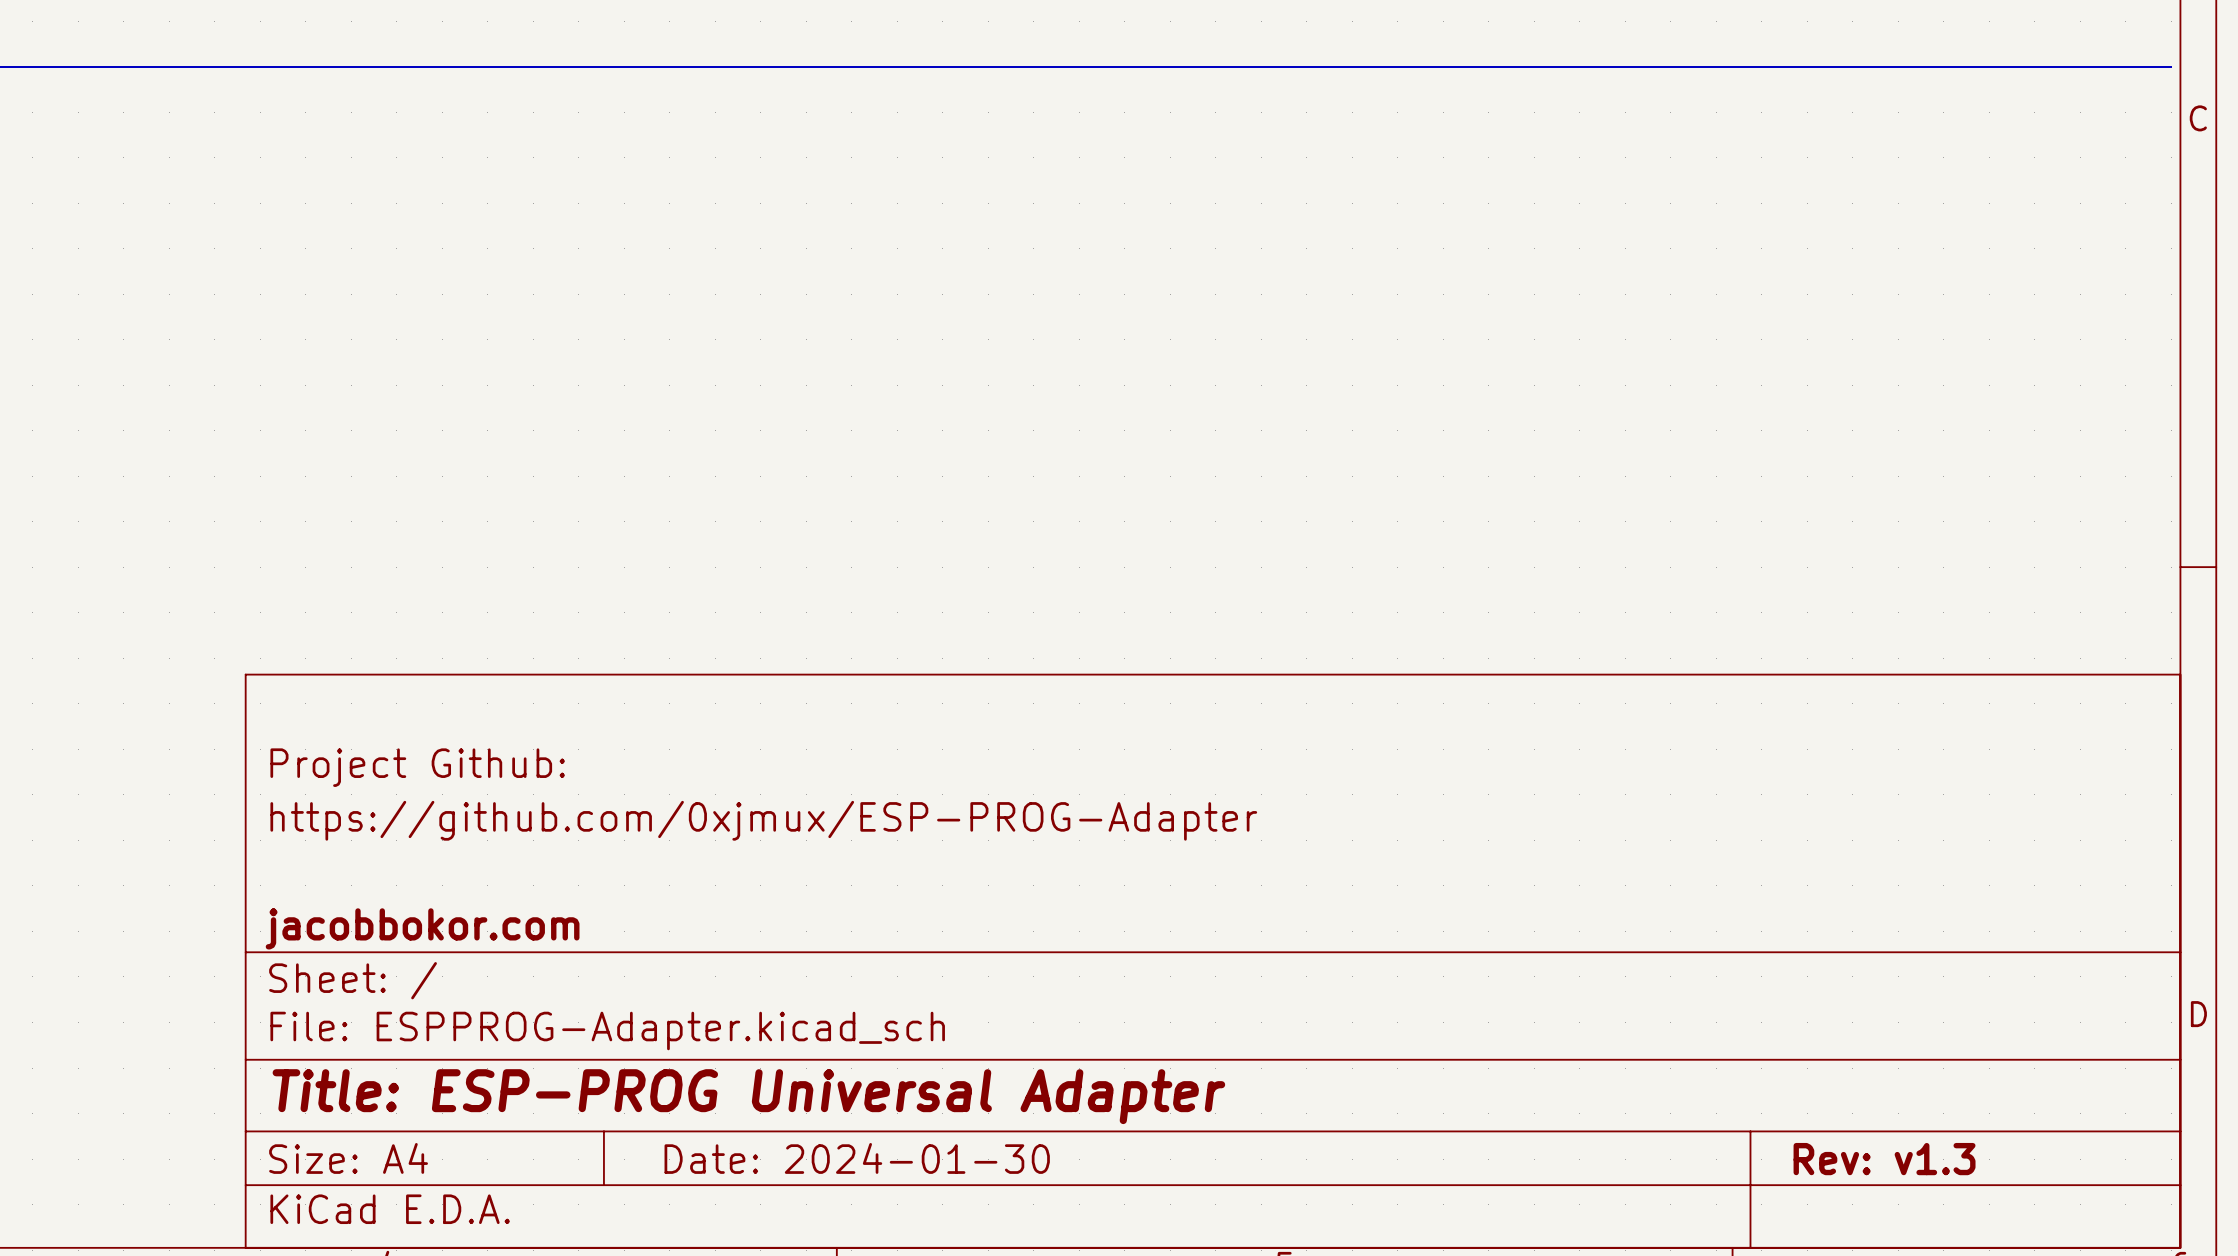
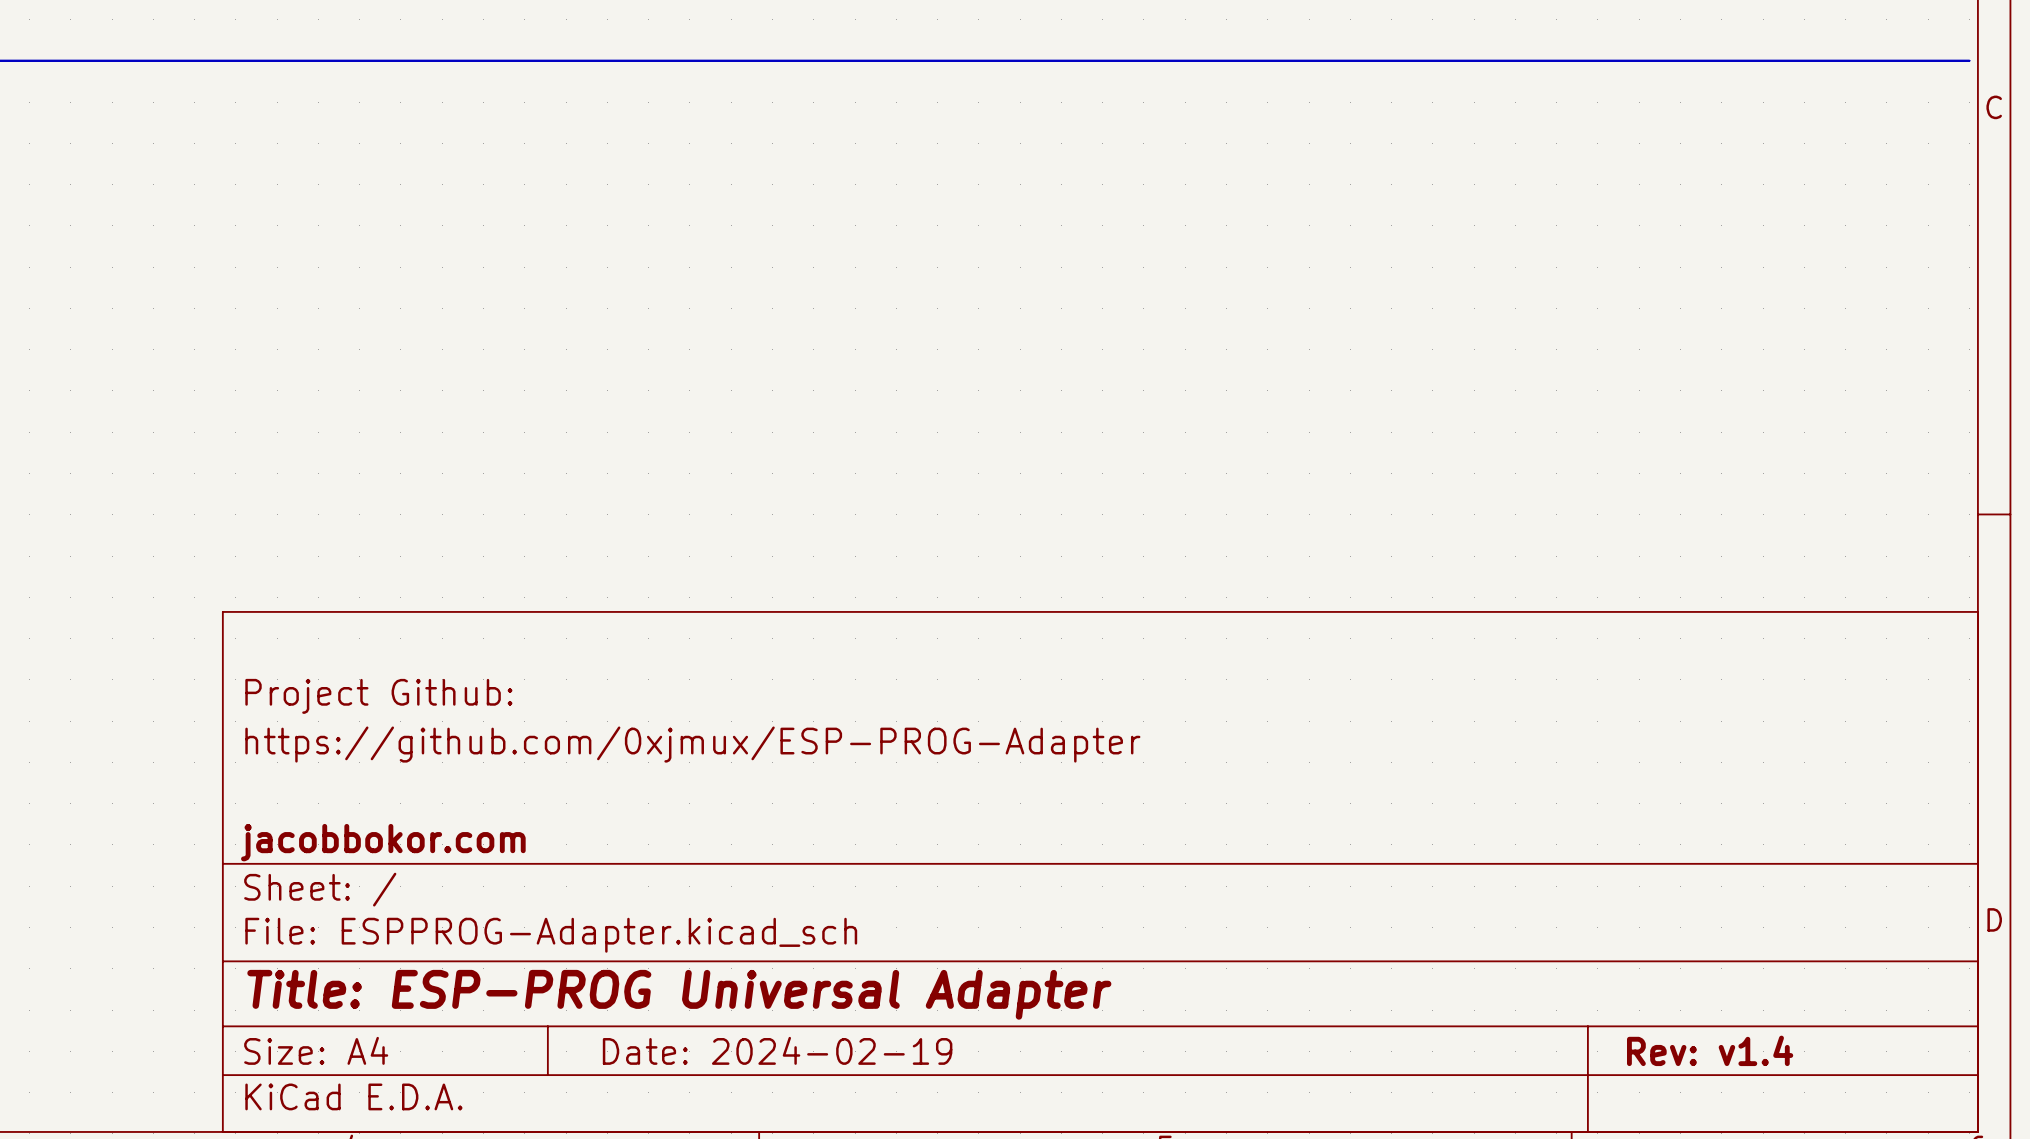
title block: Date: 2024-01-30 (857, 1158) -> Date: 2024-02-19 (777, 1050)
title block: Rev: v1.3 (1884, 1159) -> Rev: v1.4 (1710, 1050)

